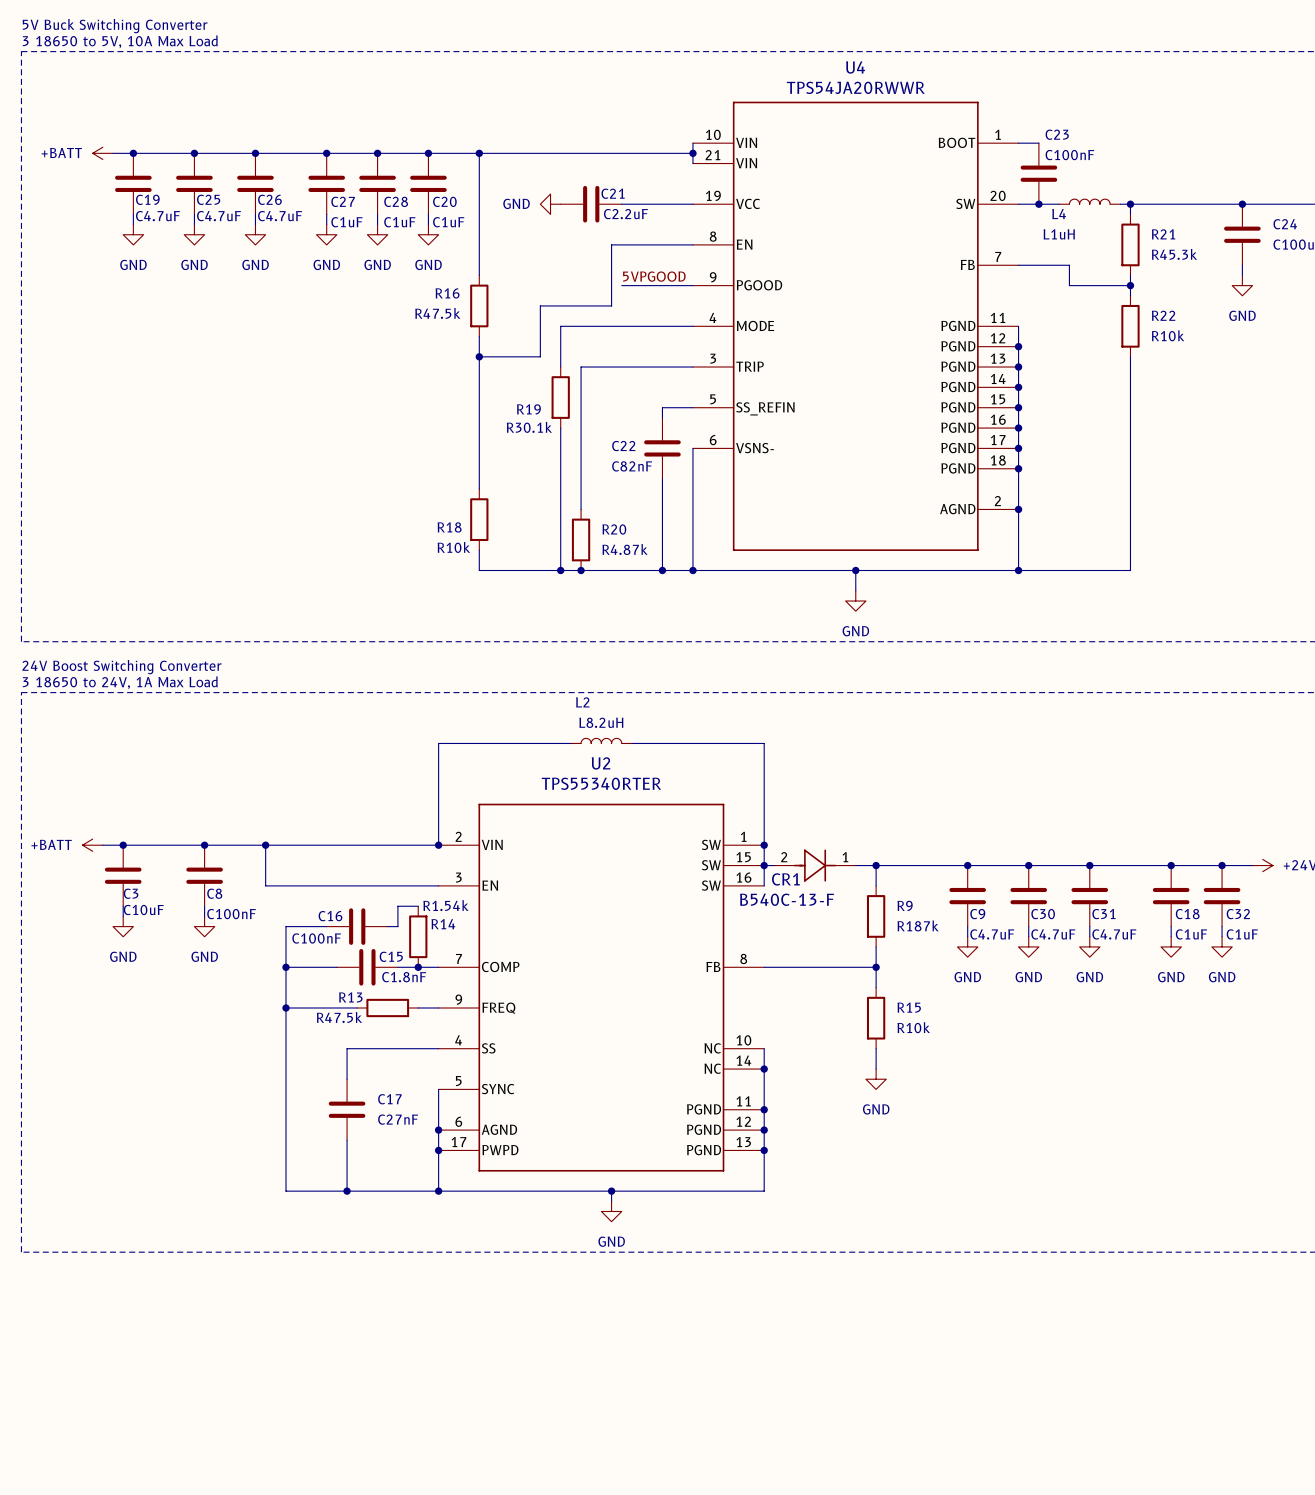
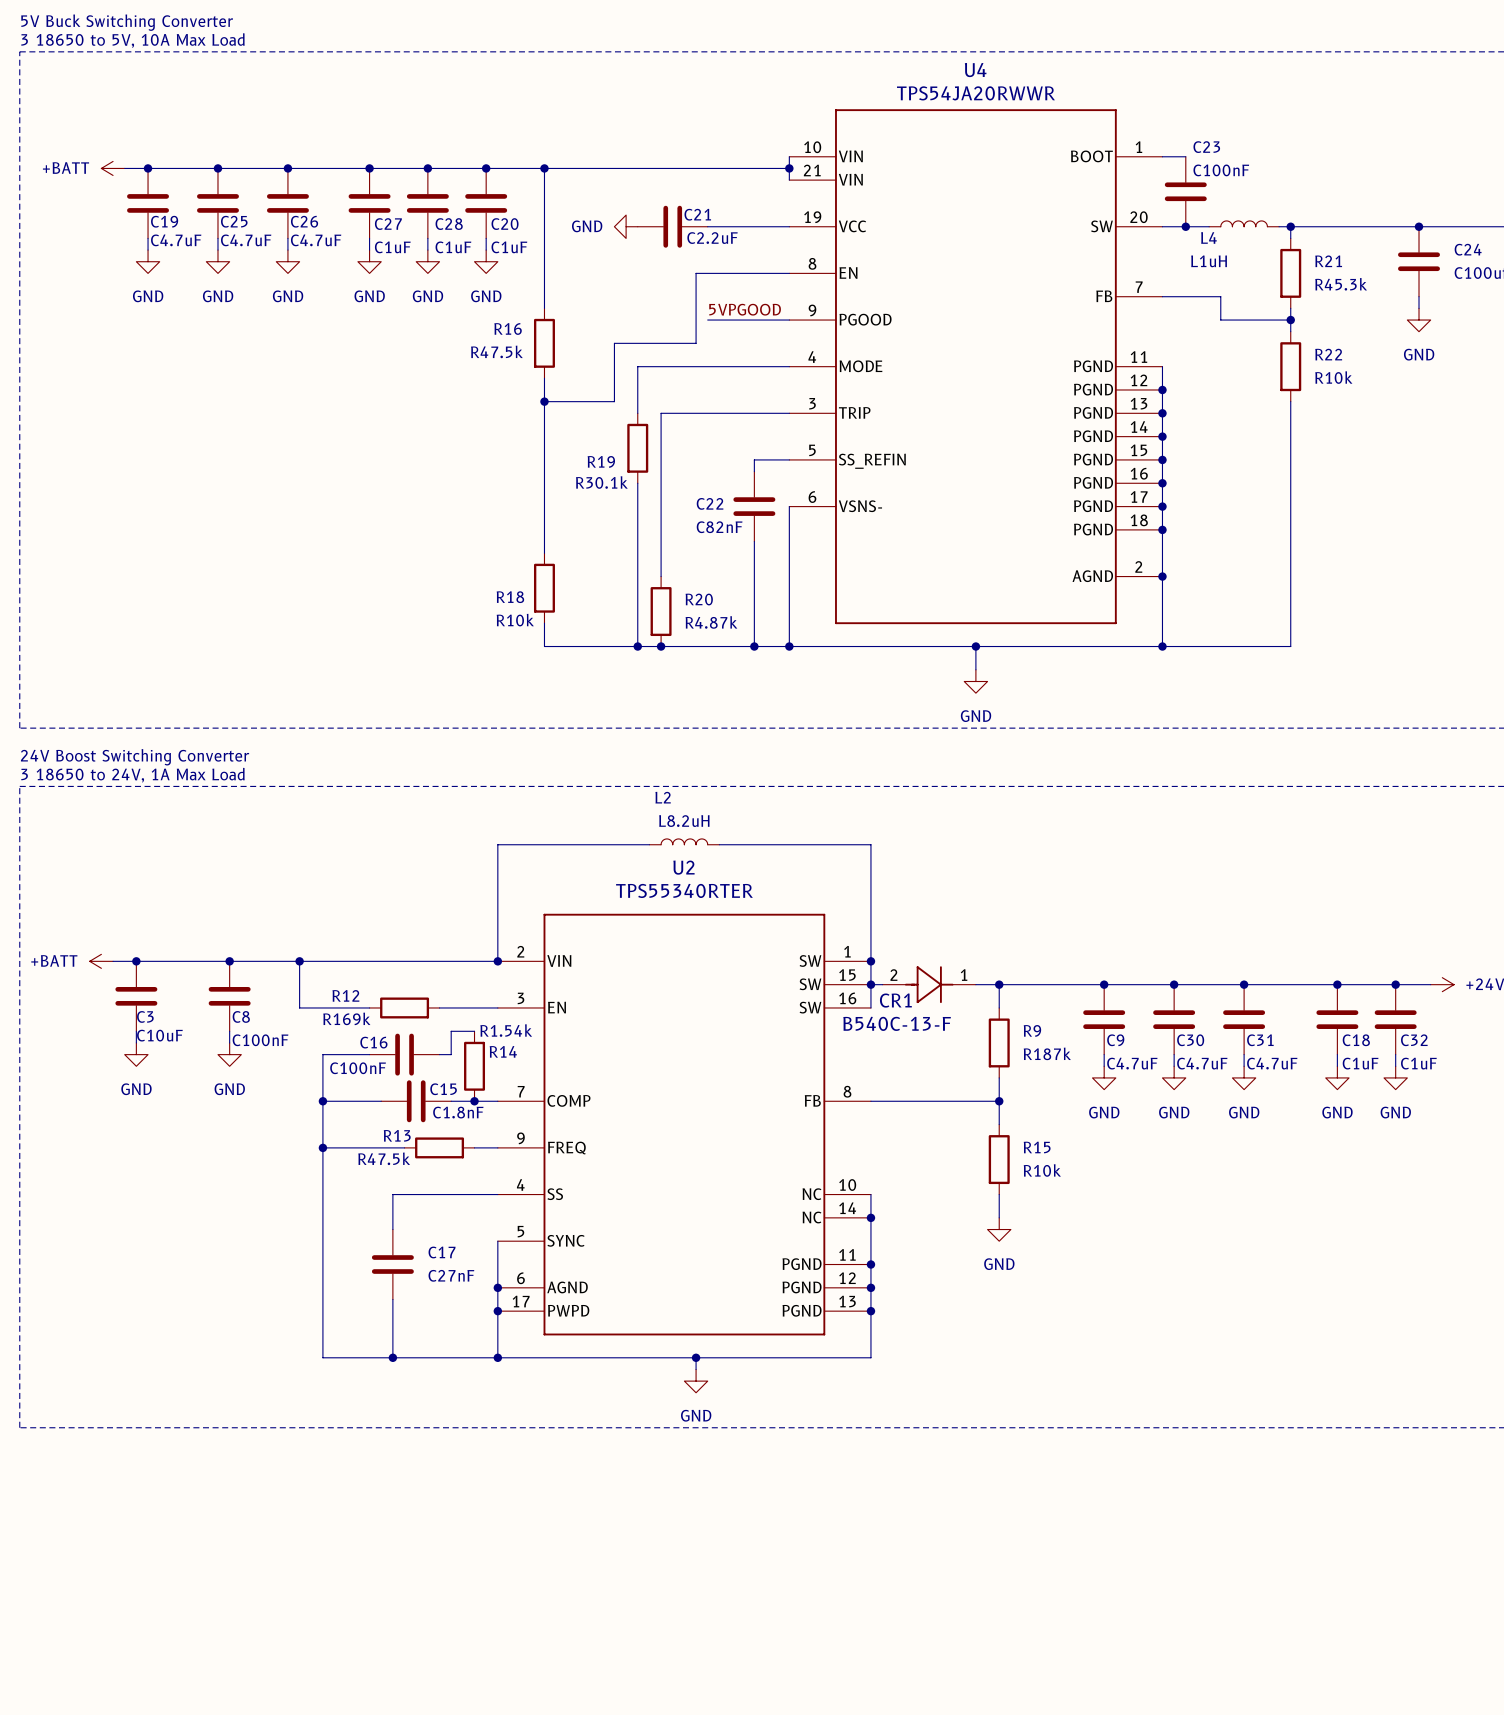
wire: (326, 885) (387, 885) -> none
R12: none -> R169k (404, 1007)

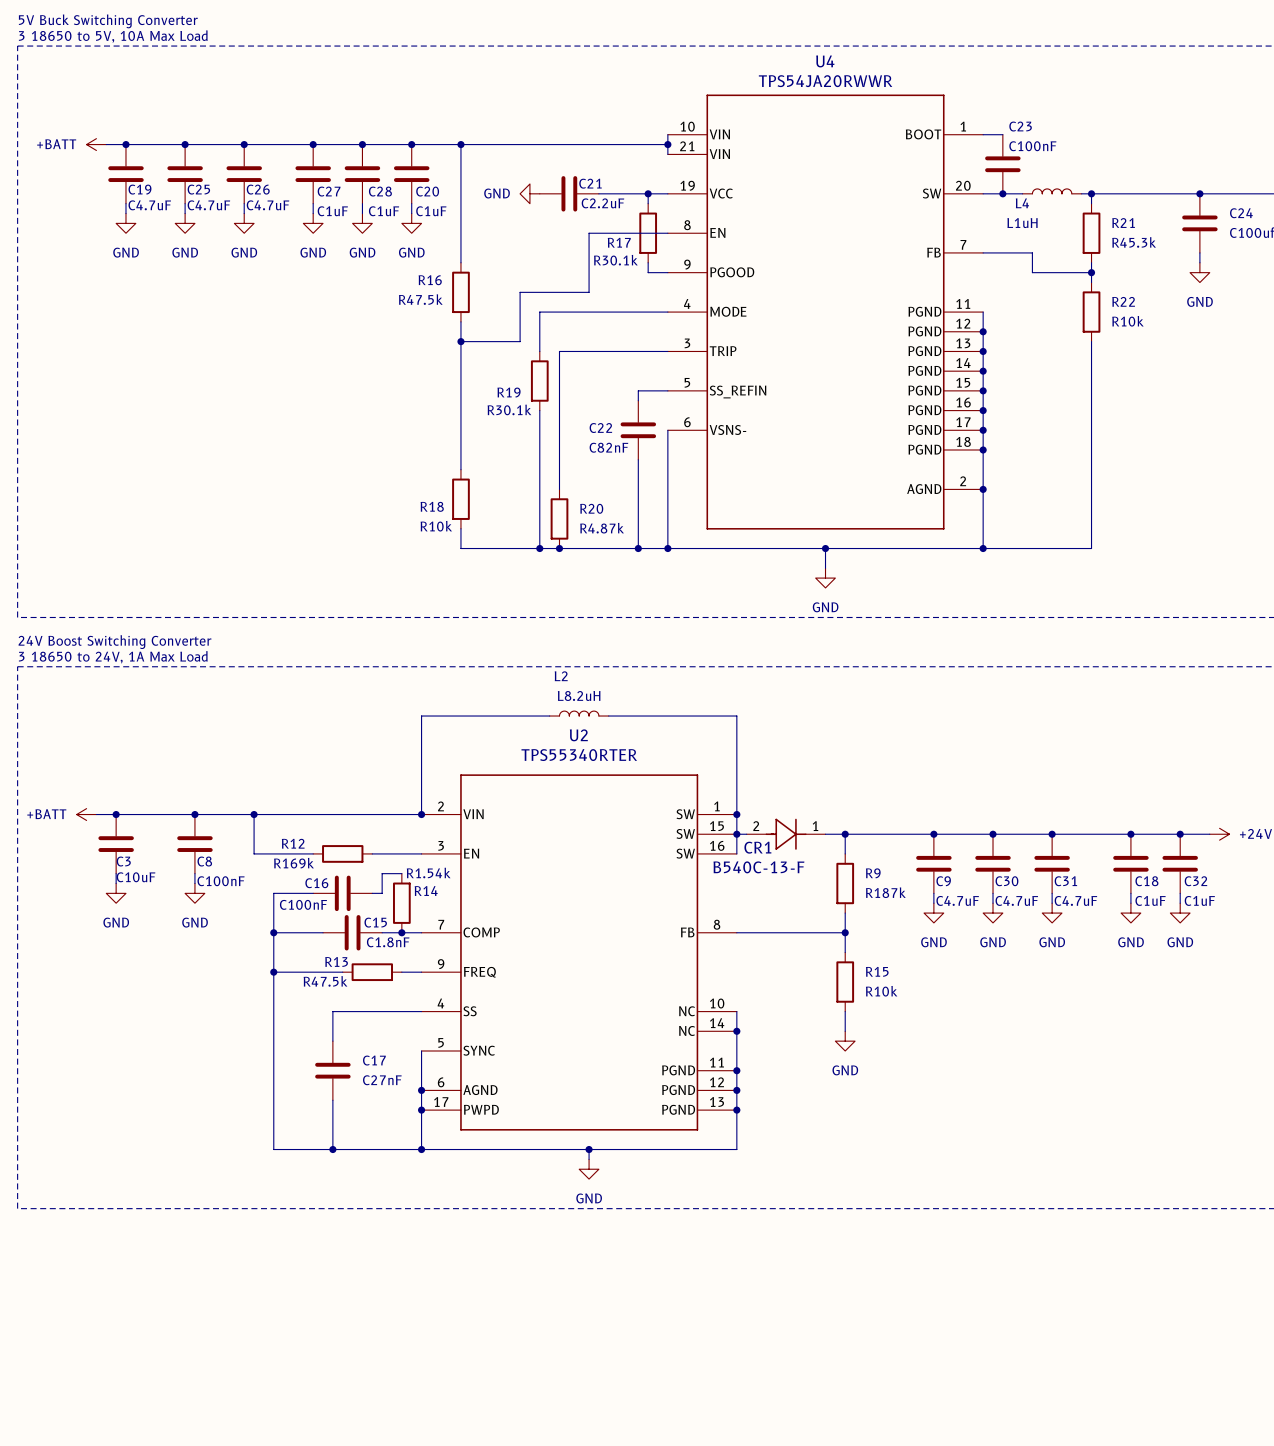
wire: none -> (648, 193) (648, 203)
junction: none -> (648, 193)
R17: none -> R30.1k (648, 233)
label: 5VPGOOD (745, 309) -> none
wire: (707, 320) (766, 320) -> (648, 262) (648, 272)

